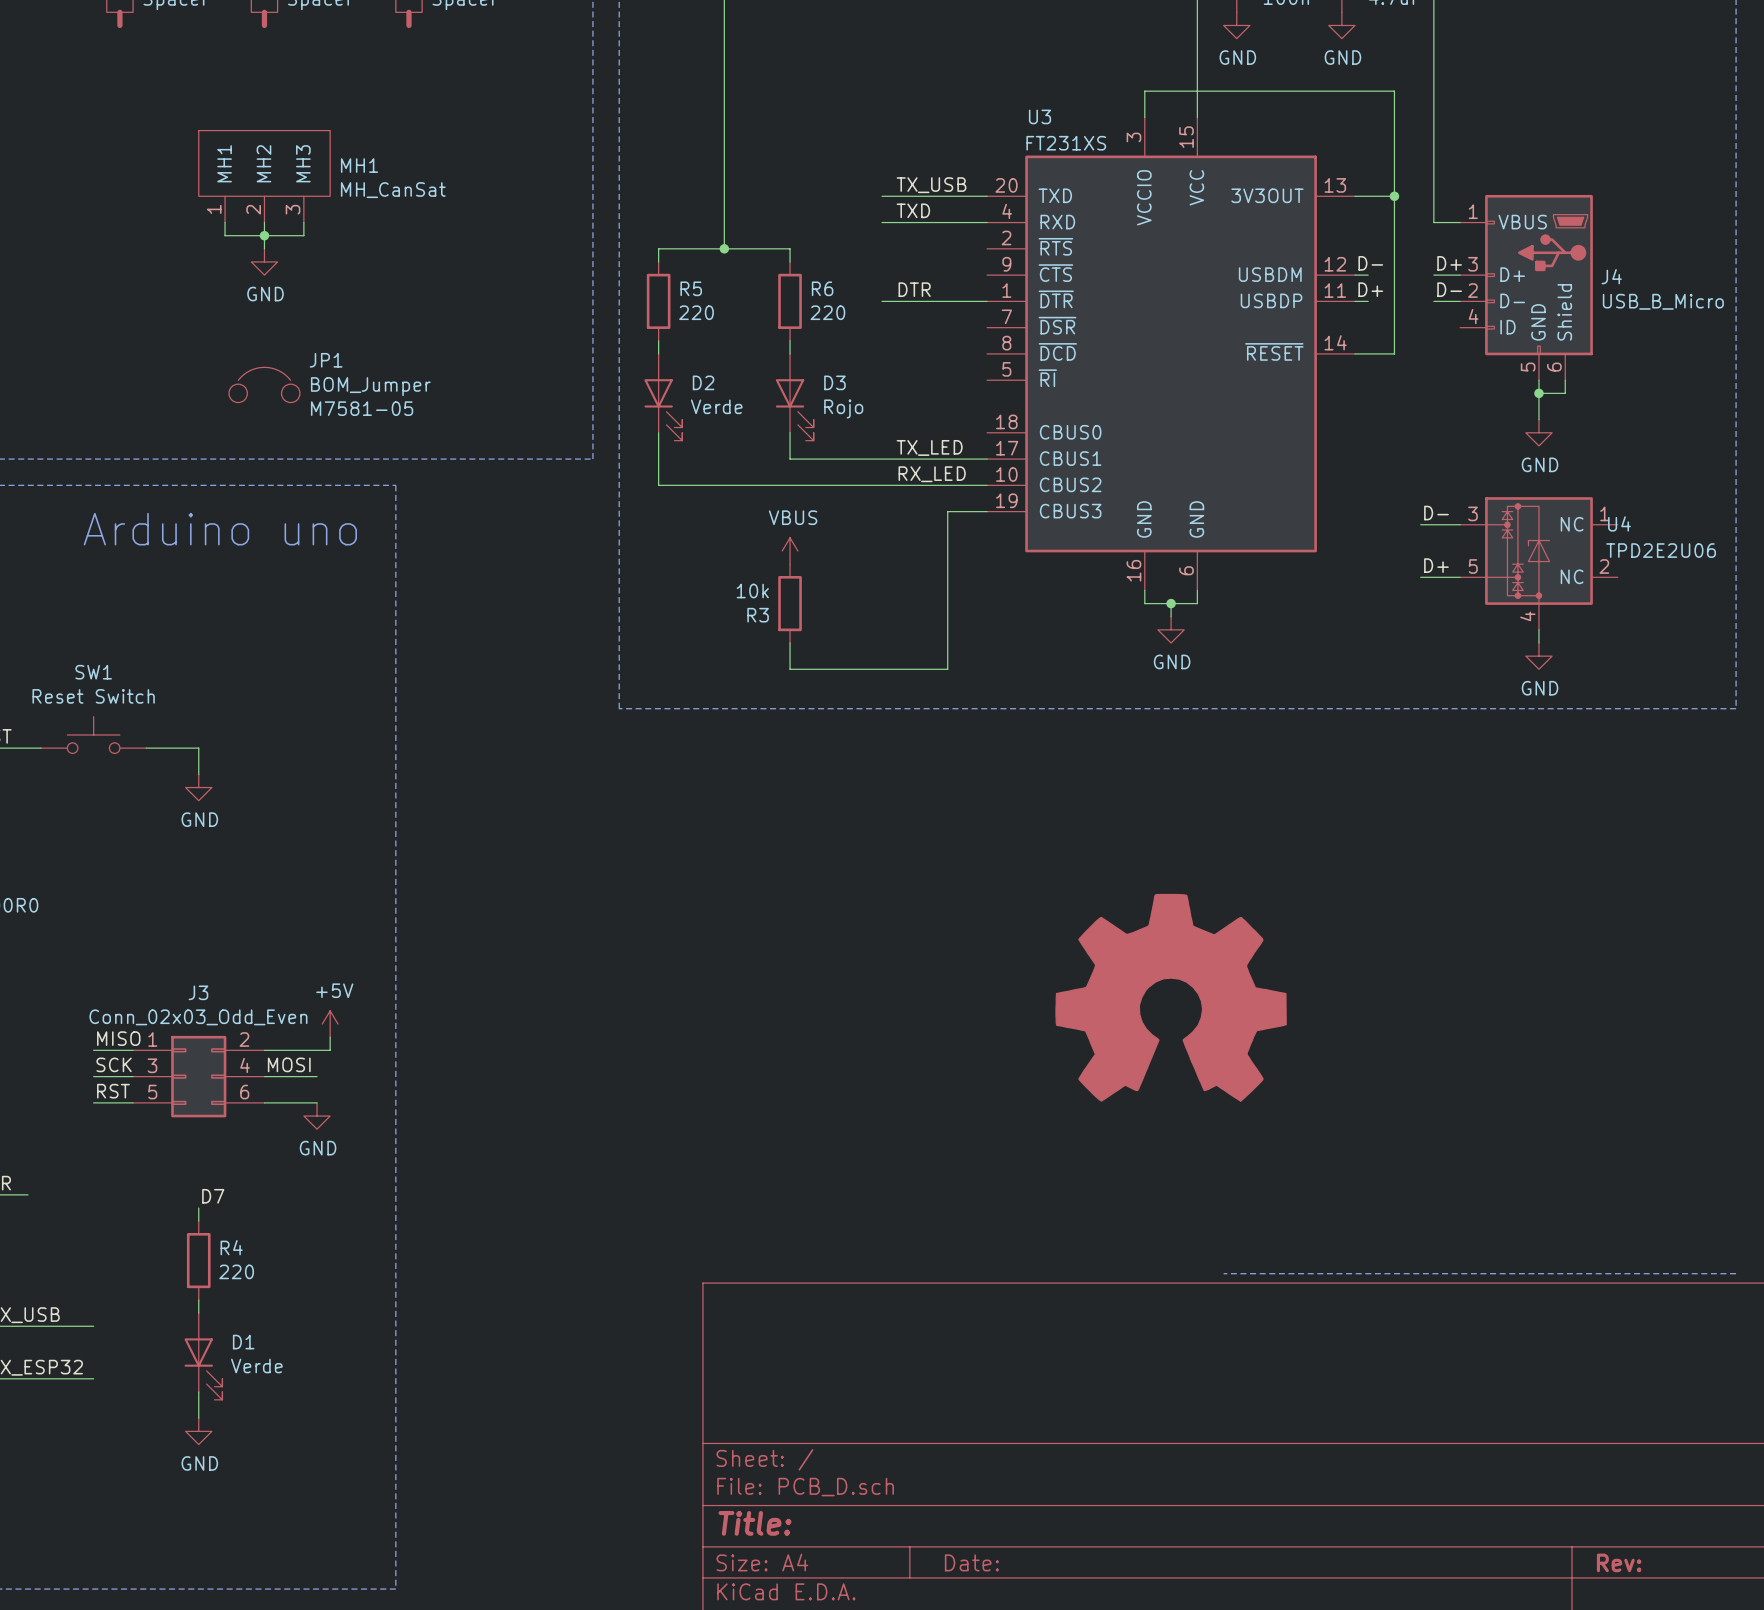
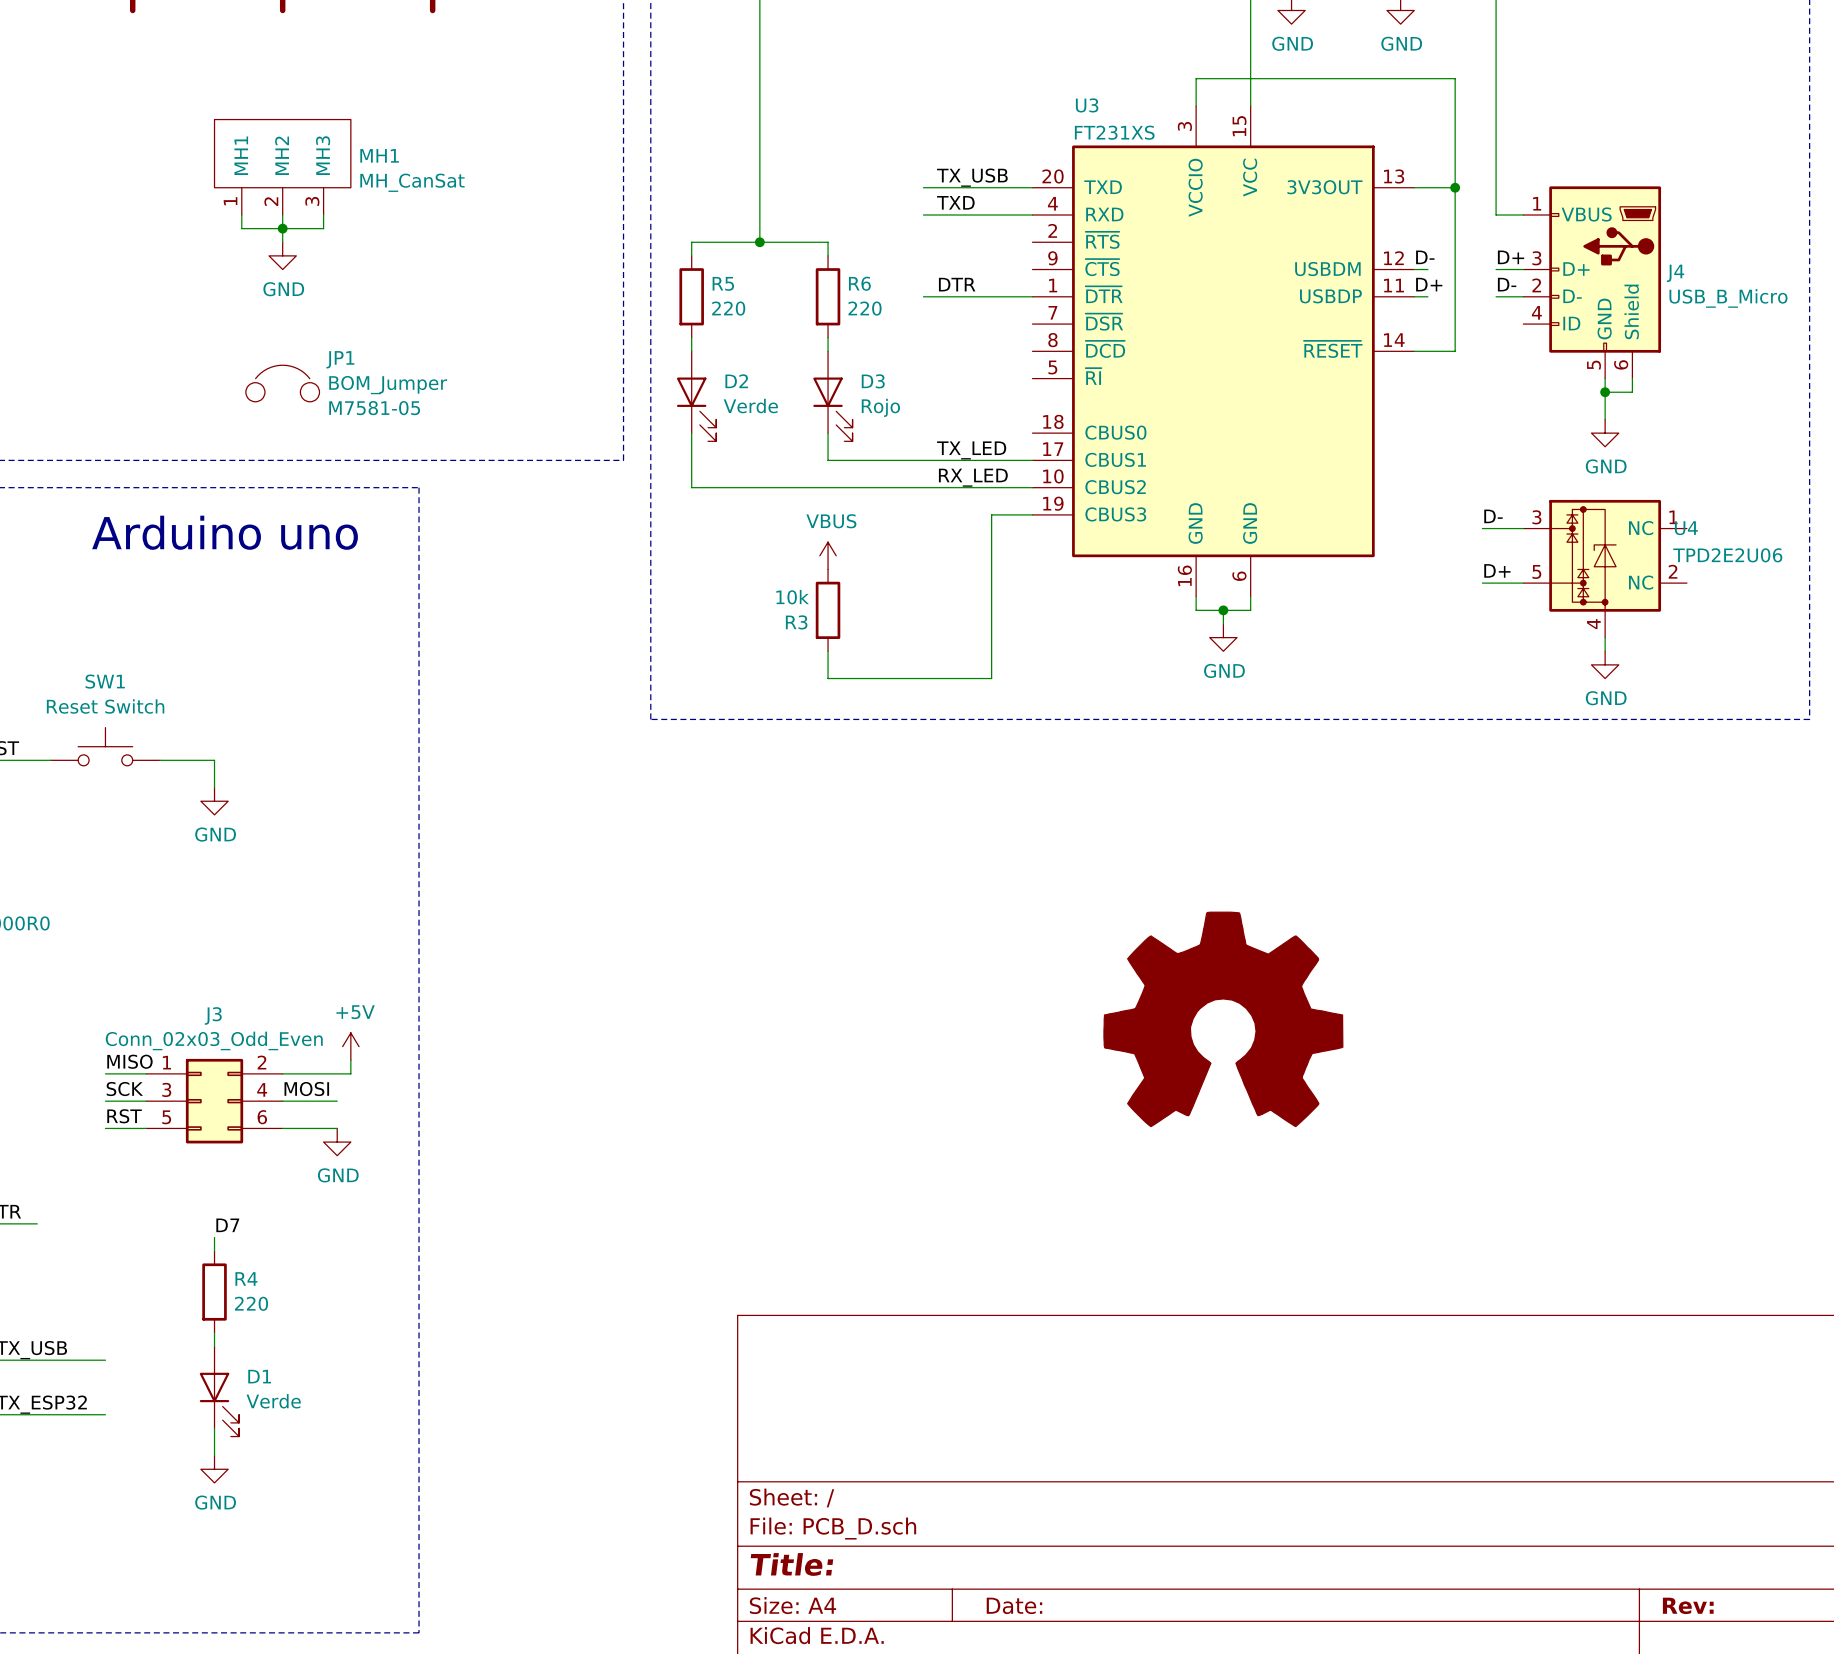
line: (1223, 1273) (1736, 1273) -> none

